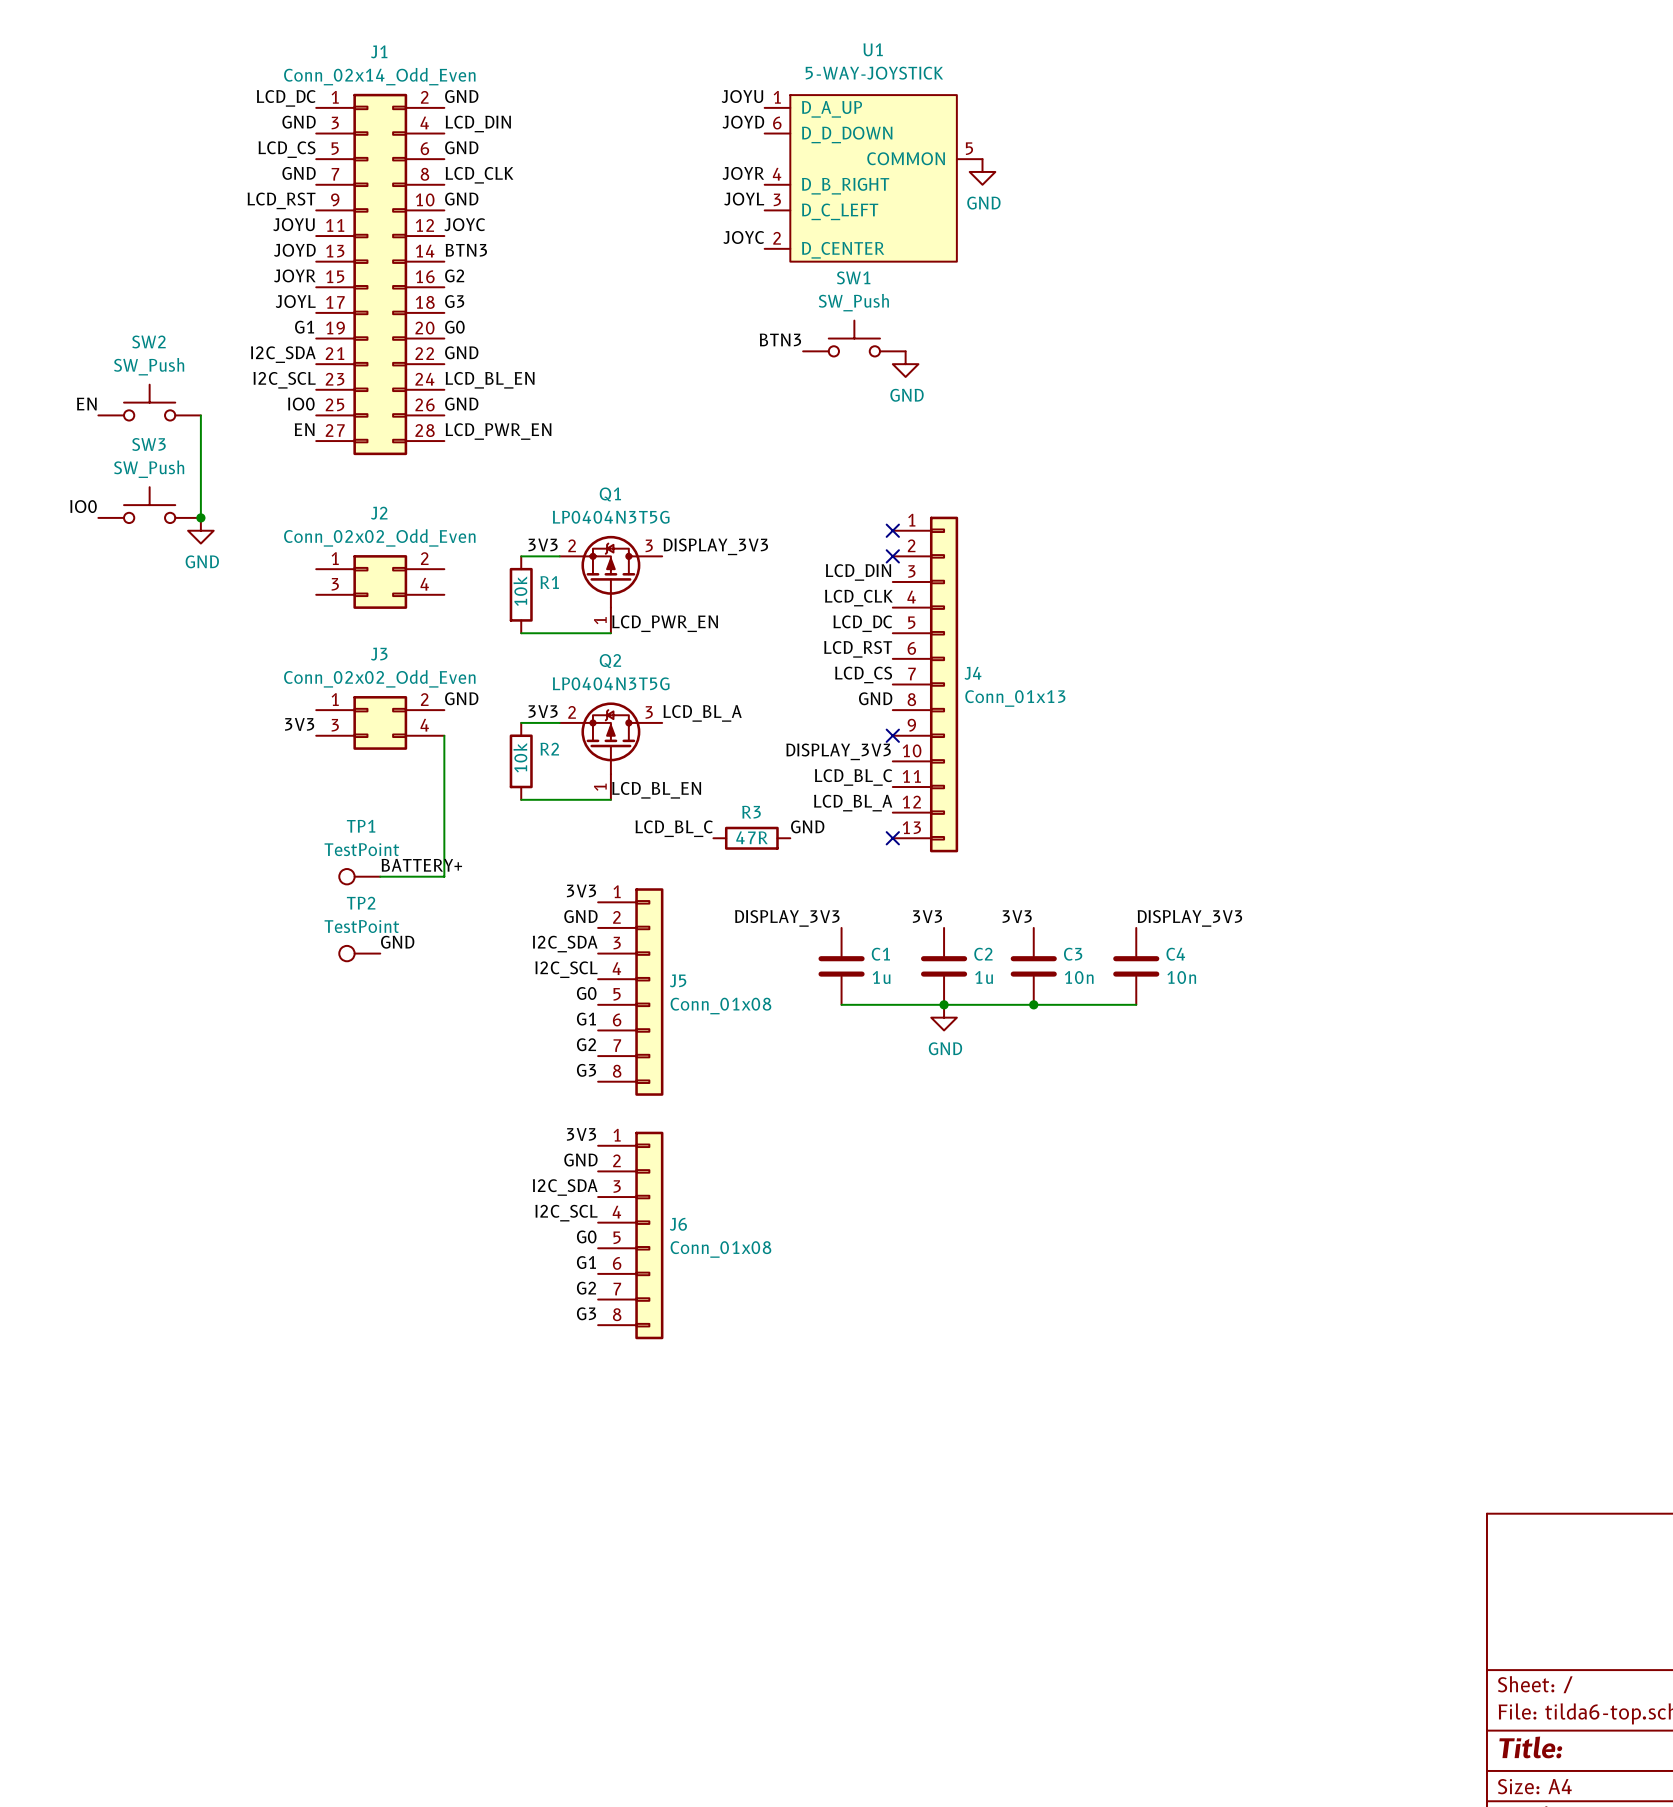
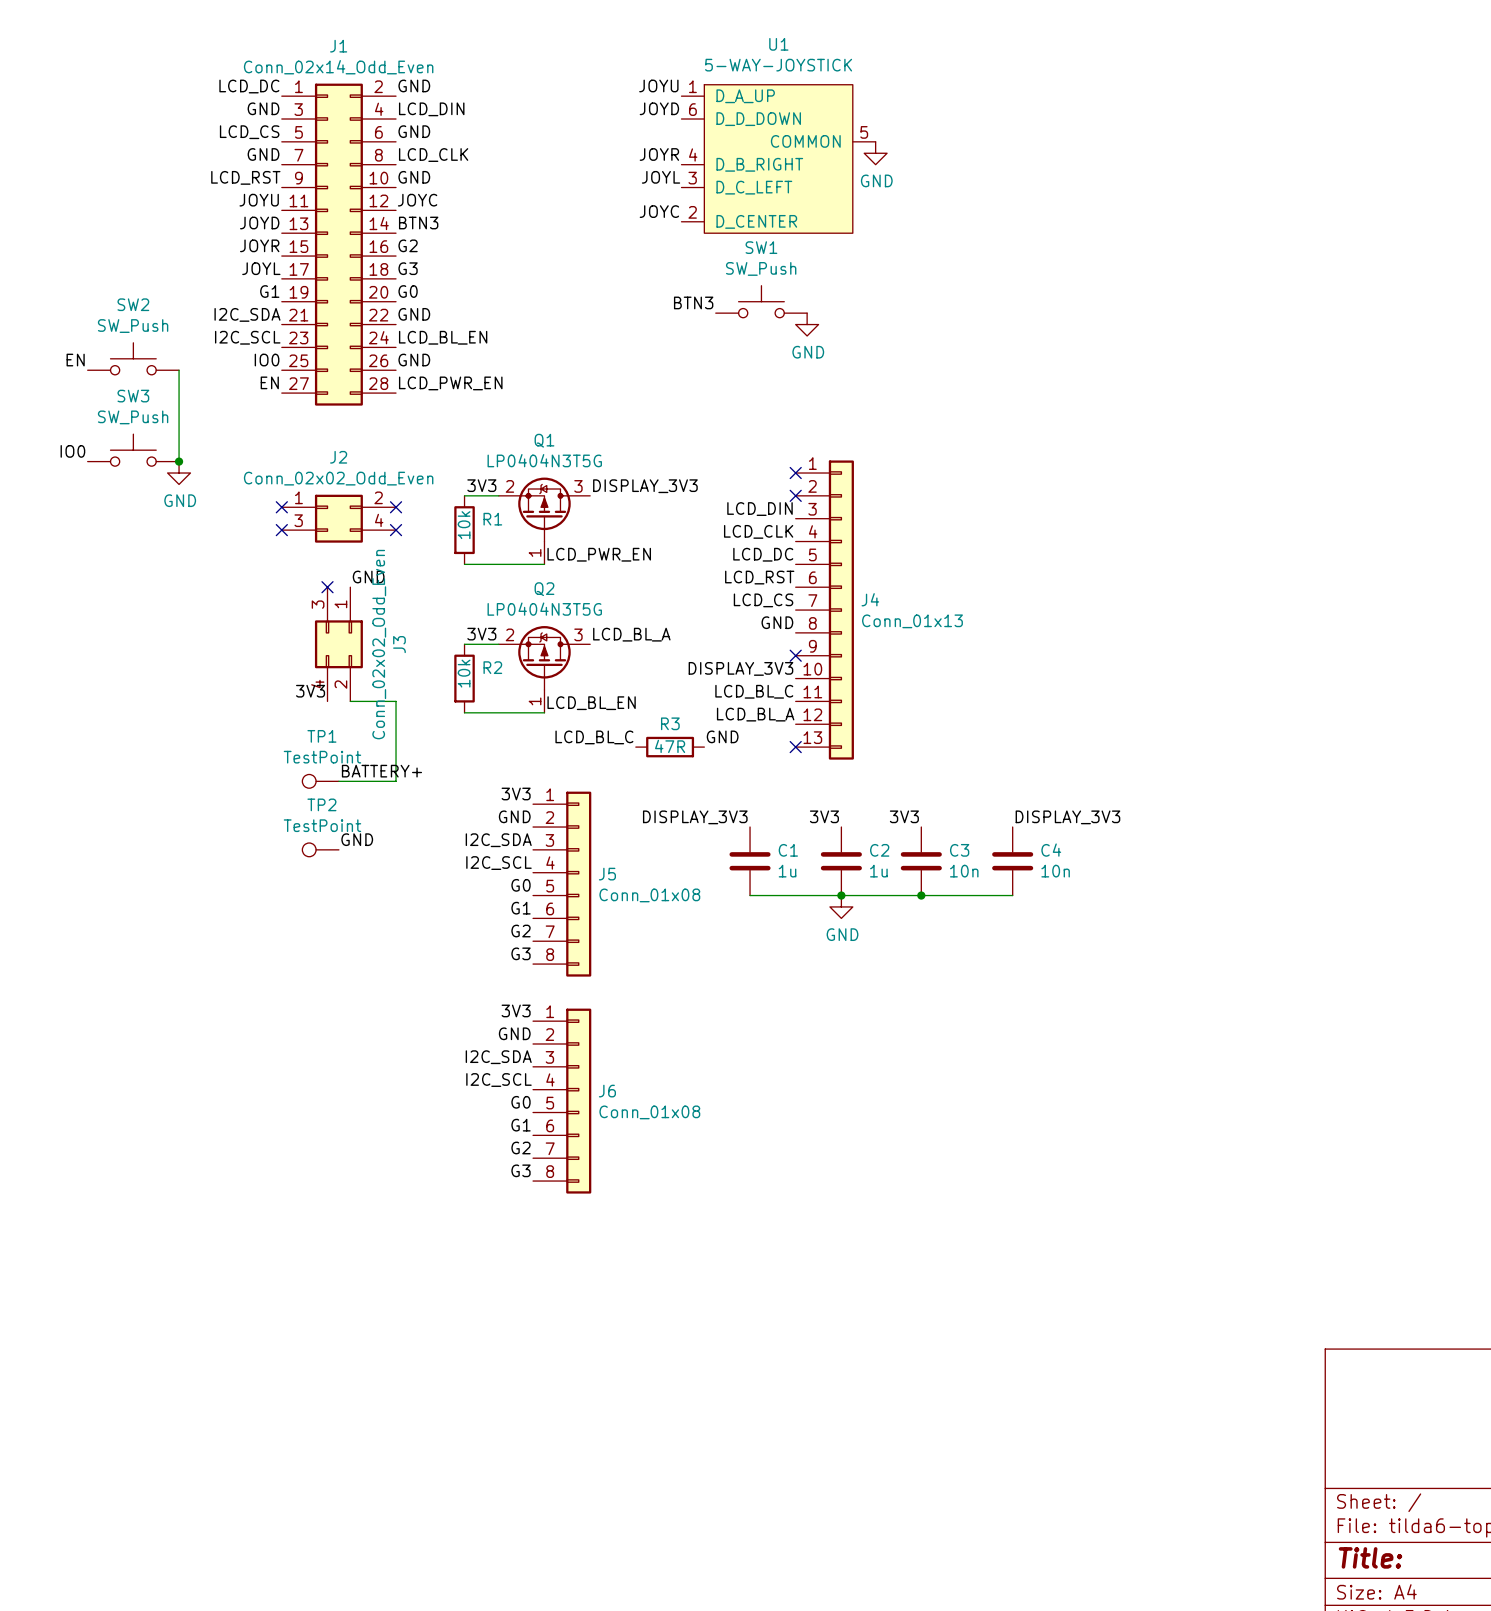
no-connect mark: none -> (281, 507)
no-connect mark: none -> (396, 507)
no-connect mark: none -> (281, 530)
no-connect mark: none -> (396, 530)
no-connect mark: none -> (327, 587)
label position: GND (461, 698) -> GND (368, 577)
J3 rotation: 0° (380, 722) -> 90° clockwise (338, 644)
label position: 3V3 (299, 724) -> 3V3 (310, 691)
wire: (444, 735) (444, 787) -> (350, 701) (396, 701)

